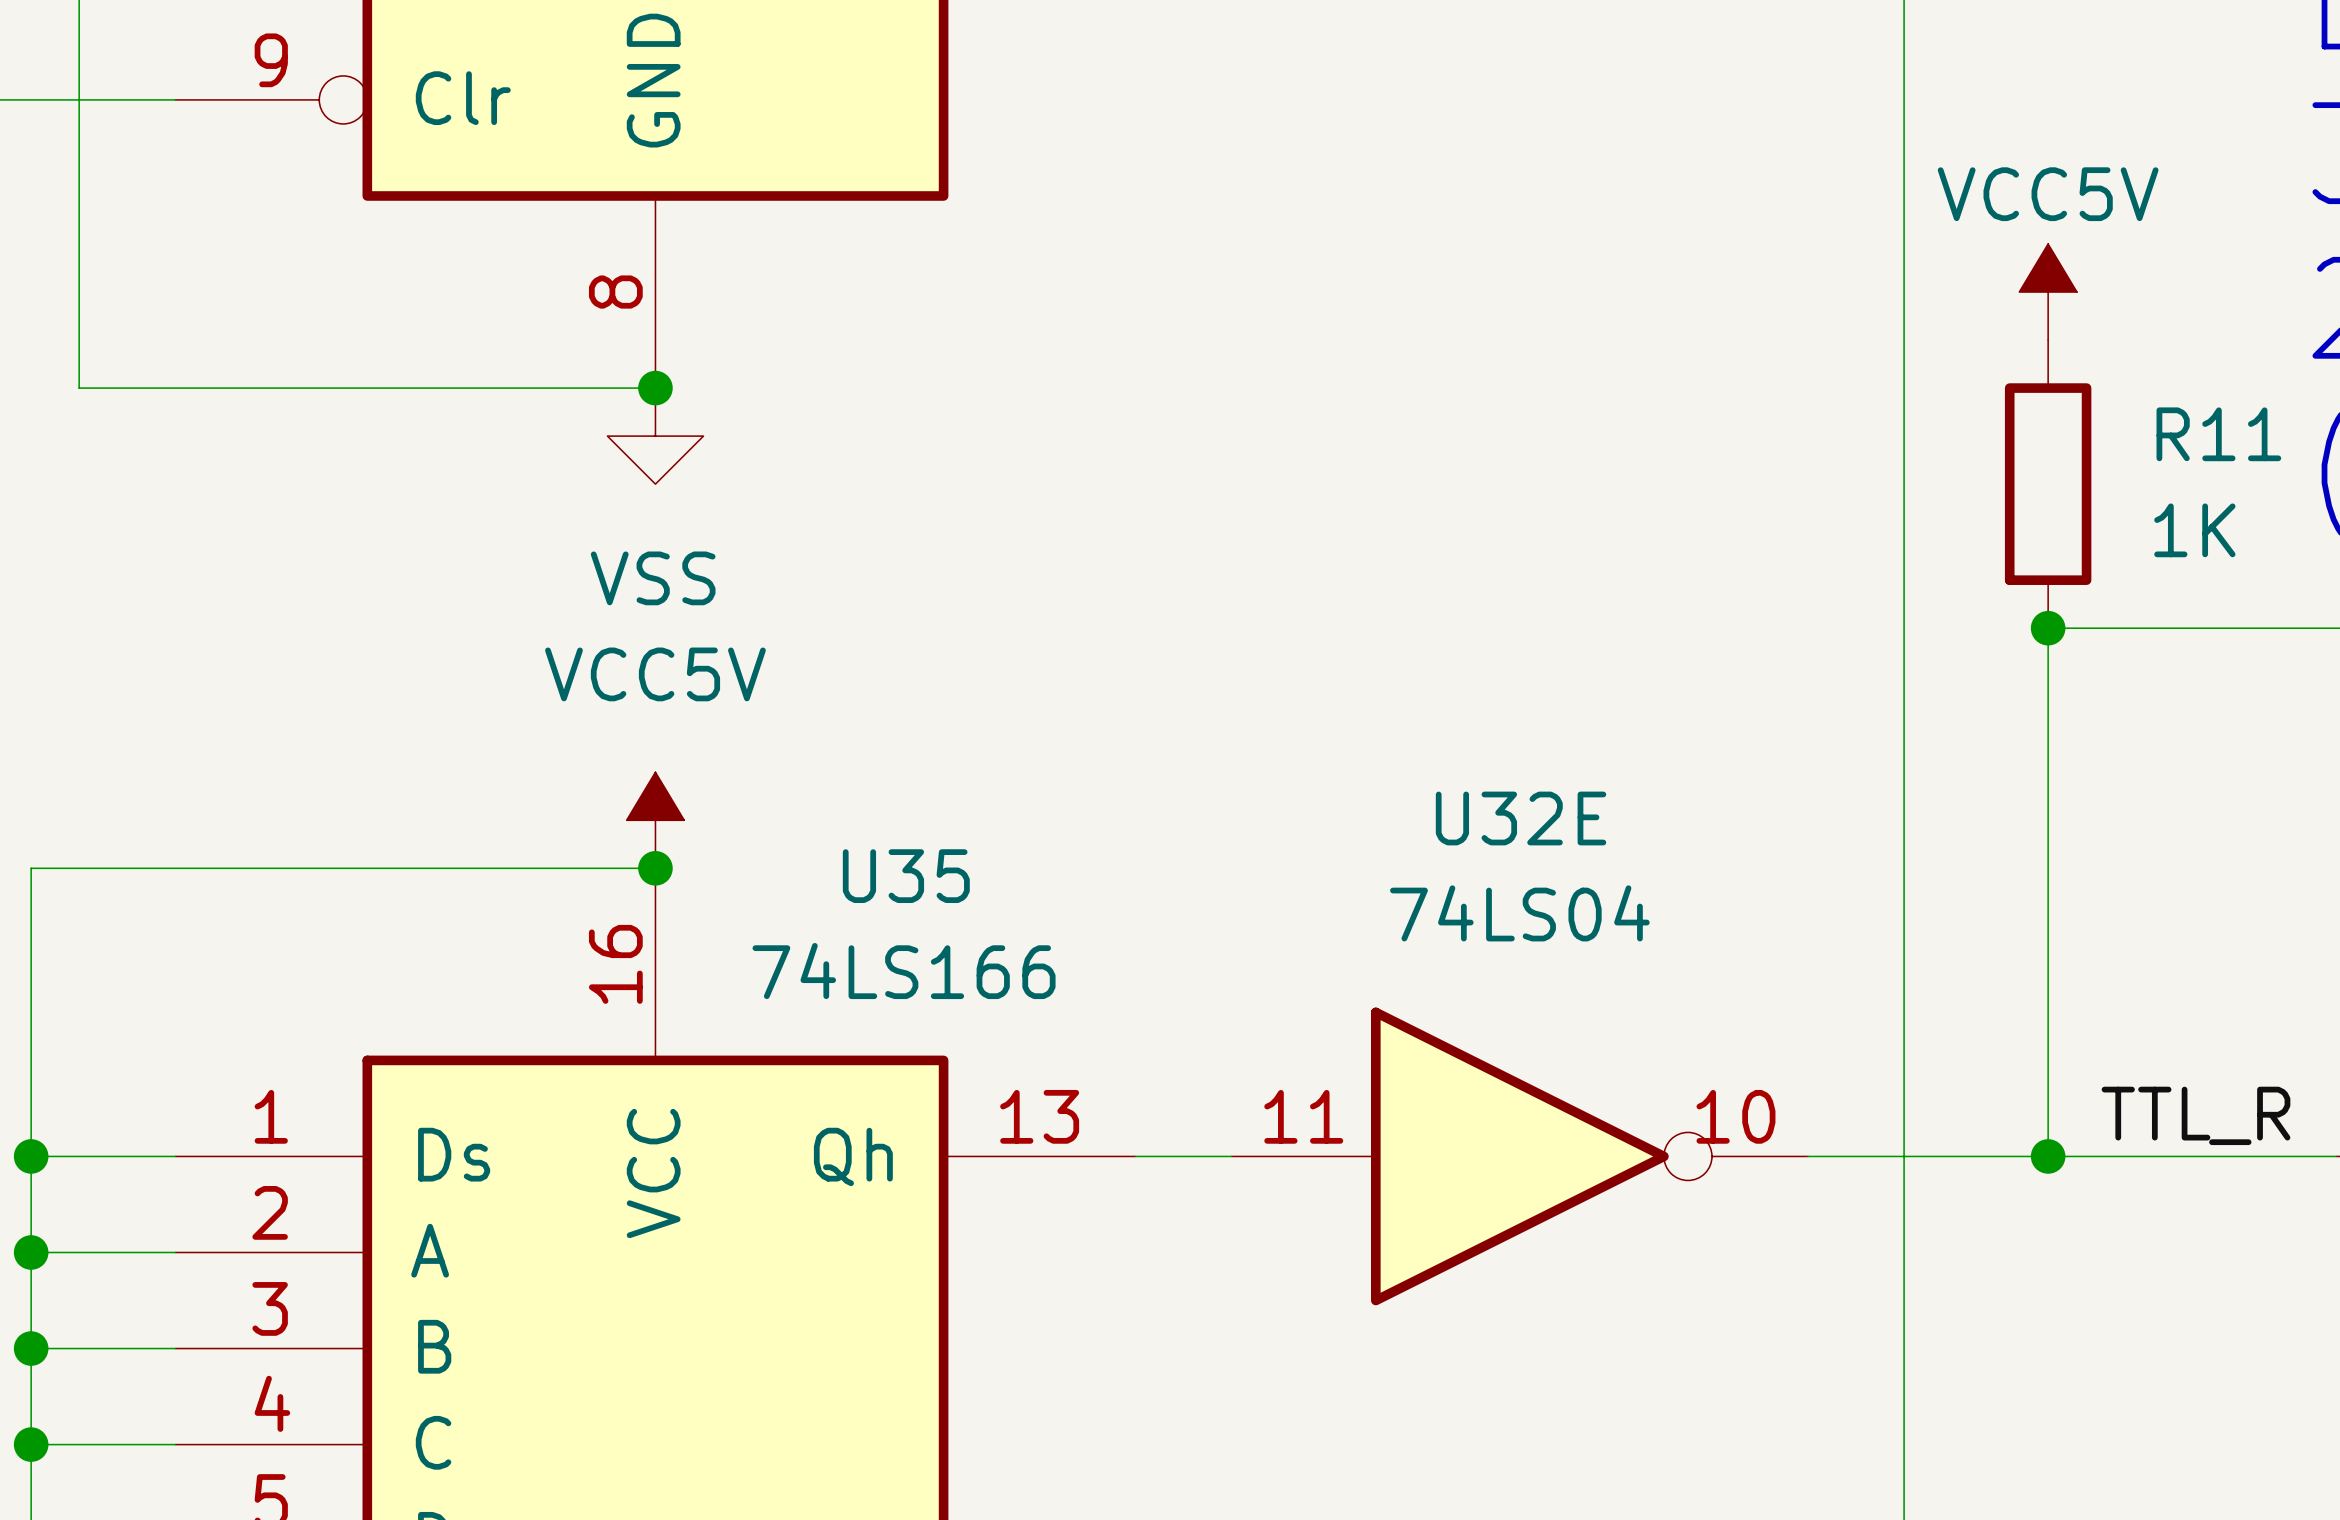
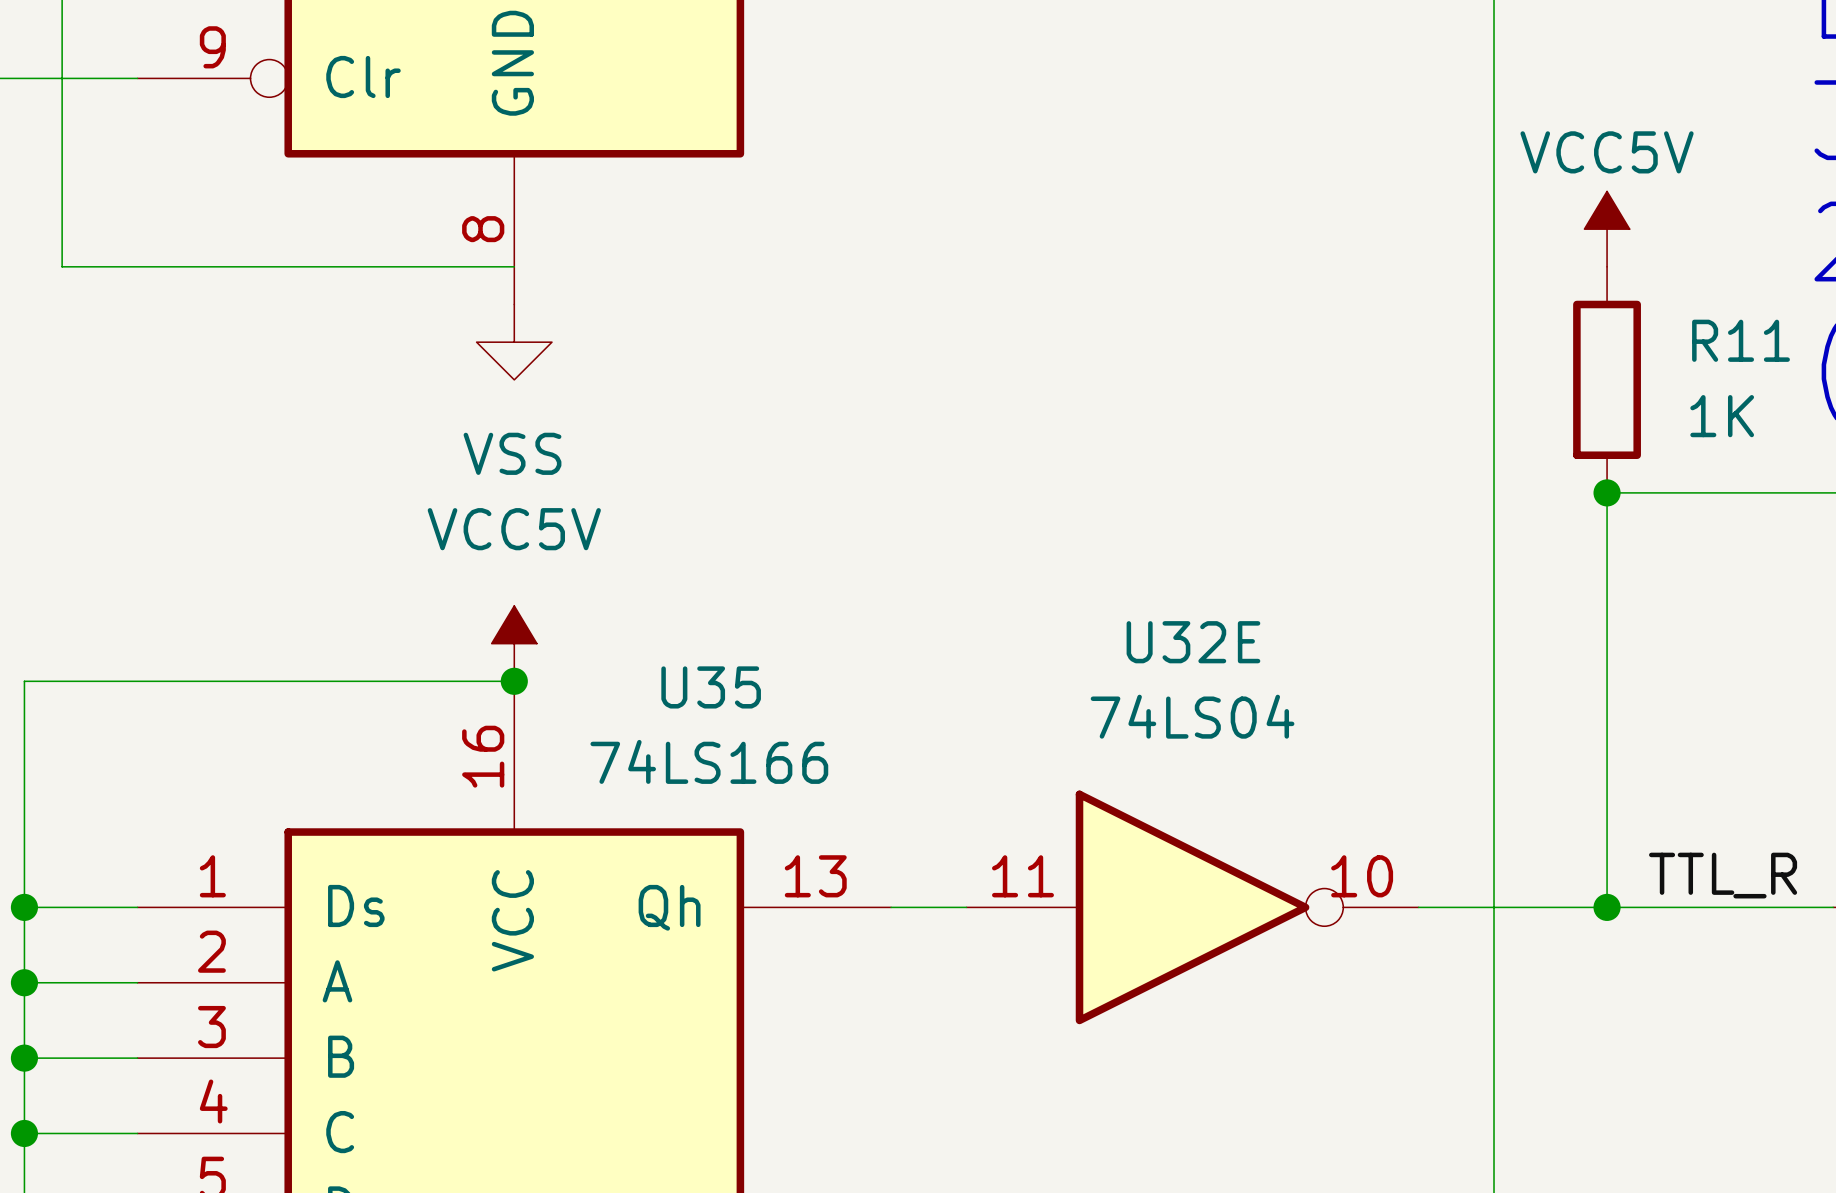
wire: (79, 340) (79, 388) (655, 388) -> (62, 266) (514, 266)
junction: (655, 388) -> none

